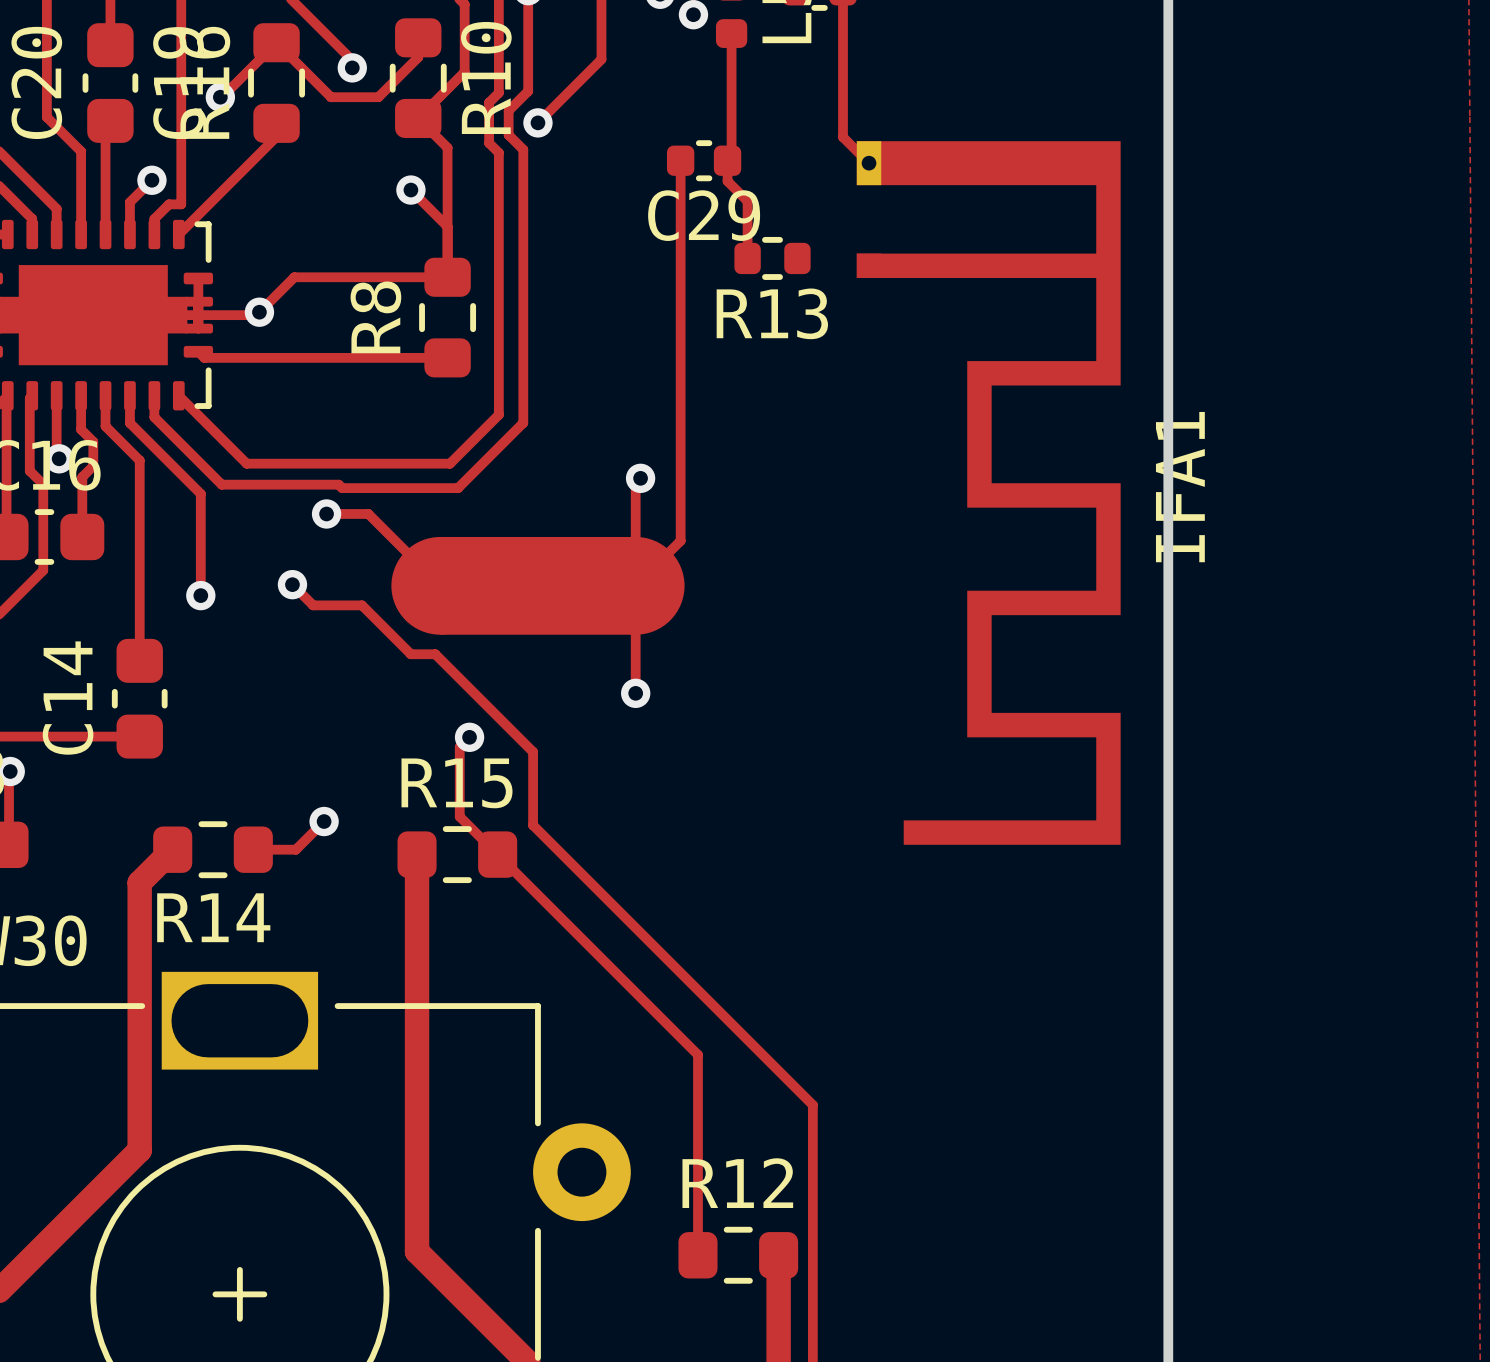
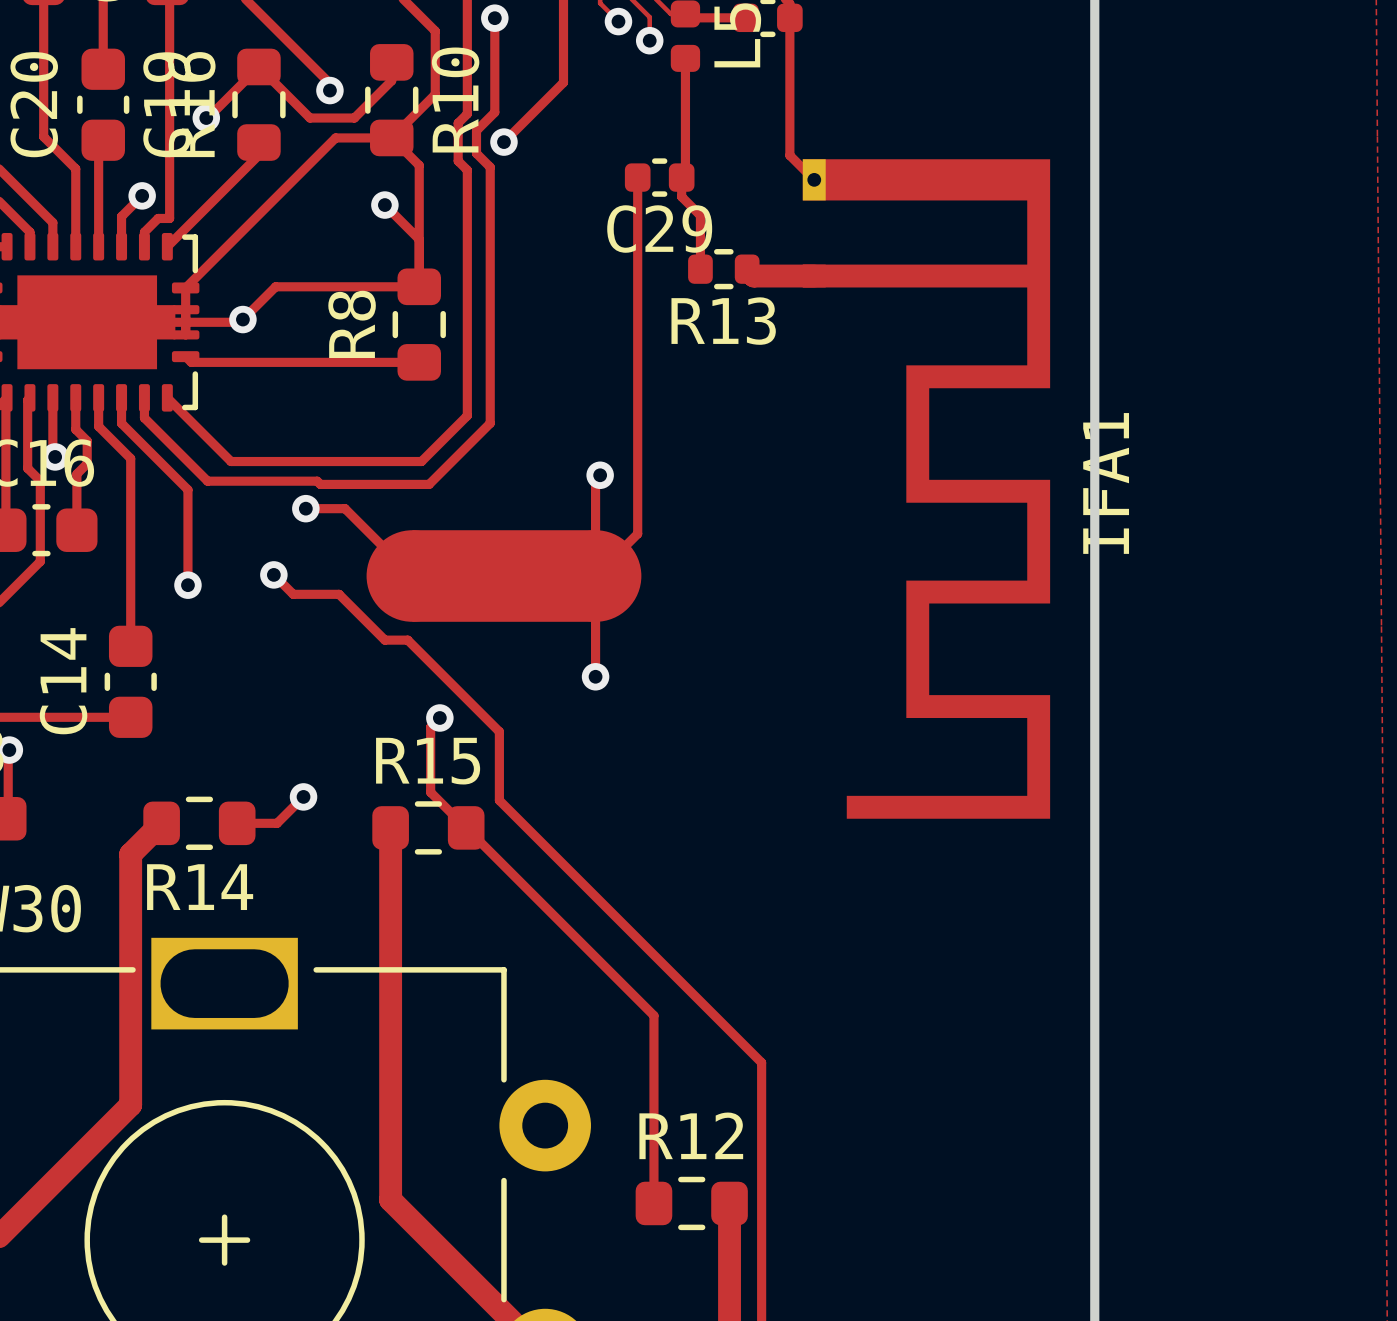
track: none -> (391, 137) (335, 137) (185, 287)
track: none -> (747, 269) (754, 276) (814, 276)

